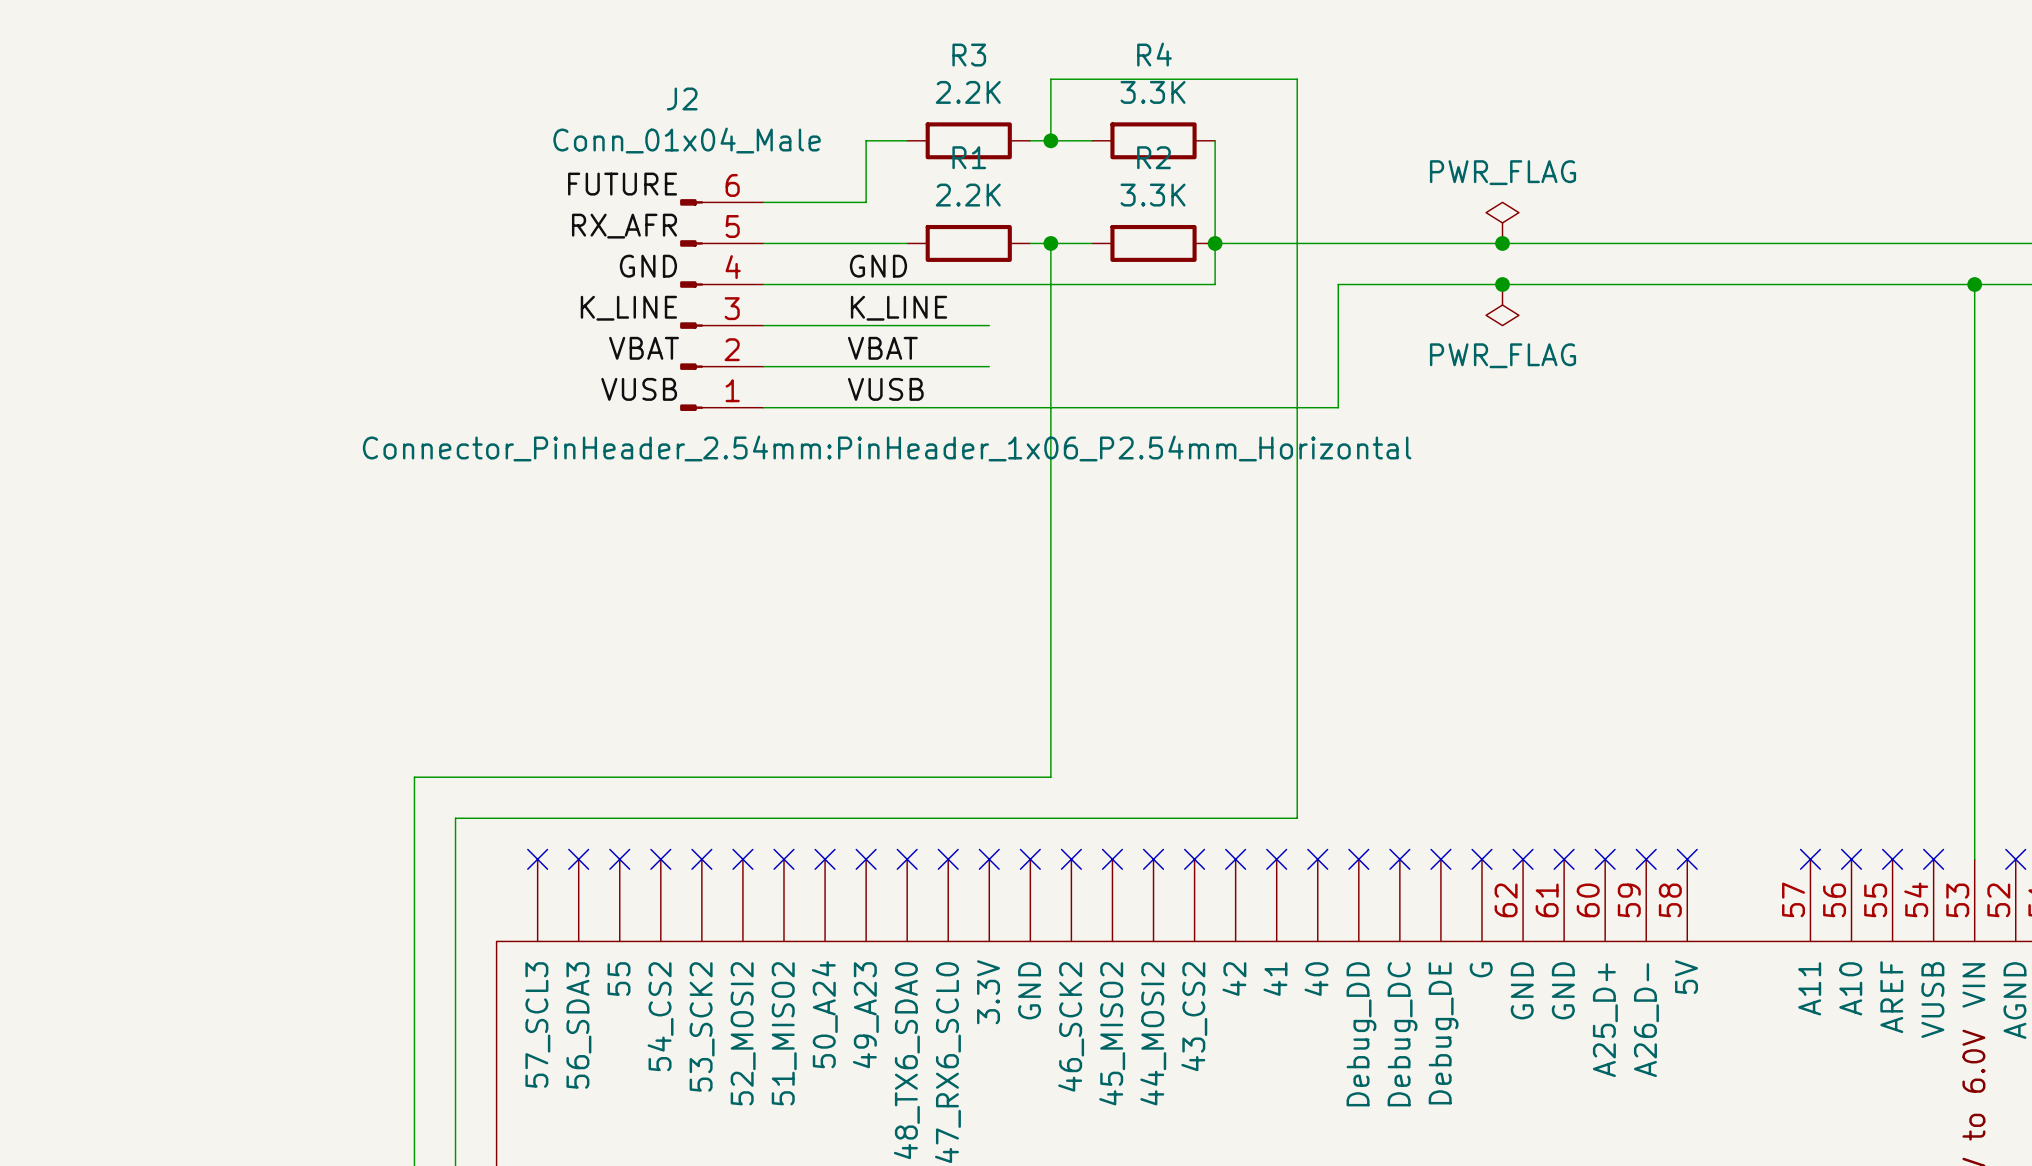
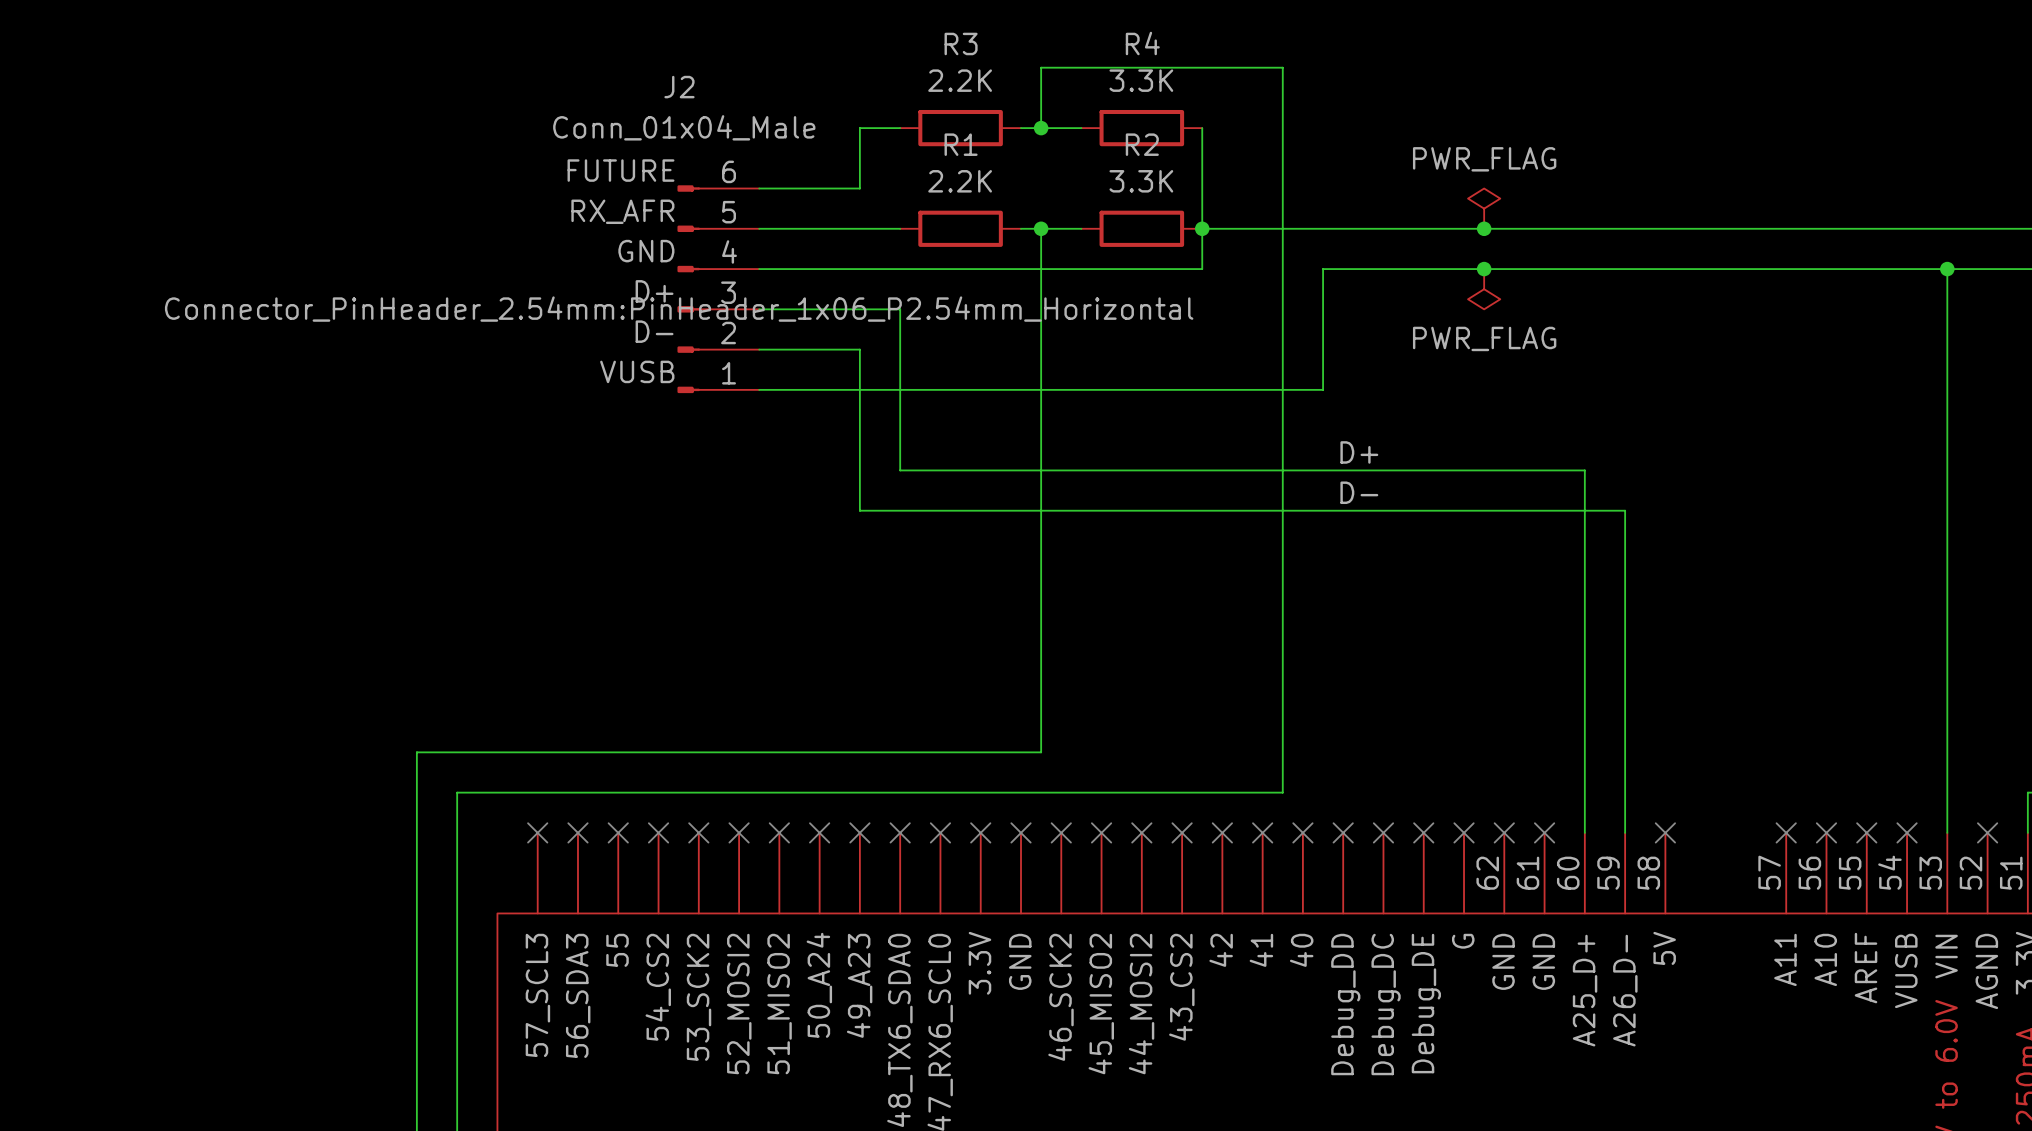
label: GND (878, 266) -> none
label: K_LINE (628, 308) -> D+ (654, 291)
label: K_LINE (899, 308) -> none
wire: (907, 325) (989, 325) -> (900, 309) (900, 470) (1584, 470) (1584, 832)
label: VBAT (644, 348) -> D- (654, 331)
label: VBAT (882, 348) -> none
wire: (866, 366) (989, 366) -> (859, 349) (859, 510) (1625, 510) (1625, 832)
label: VUSB (885, 389) -> none
J2 text position: Connector_PinHeader_2.54mm:PinHeader_1x06_P2.54mm_Horizontal (887, 448) -> Connector_PinHeader_2.54mm:PinHeader_1x06_P2.54mm_Horizontal (679, 309)
label: none -> D+ (1359, 452)
label: none -> D- (1359, 492)
no-connect mark: (1605, 859) -> none
no-connect mark: (1646, 859) -> none

